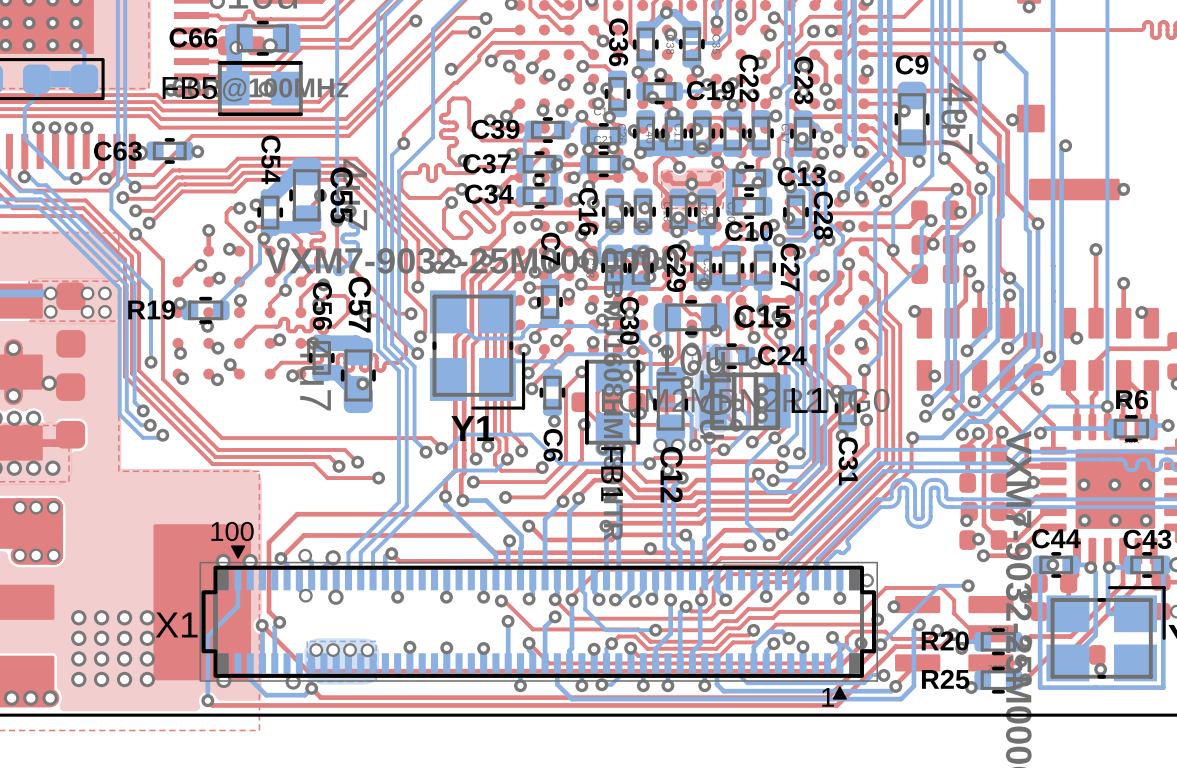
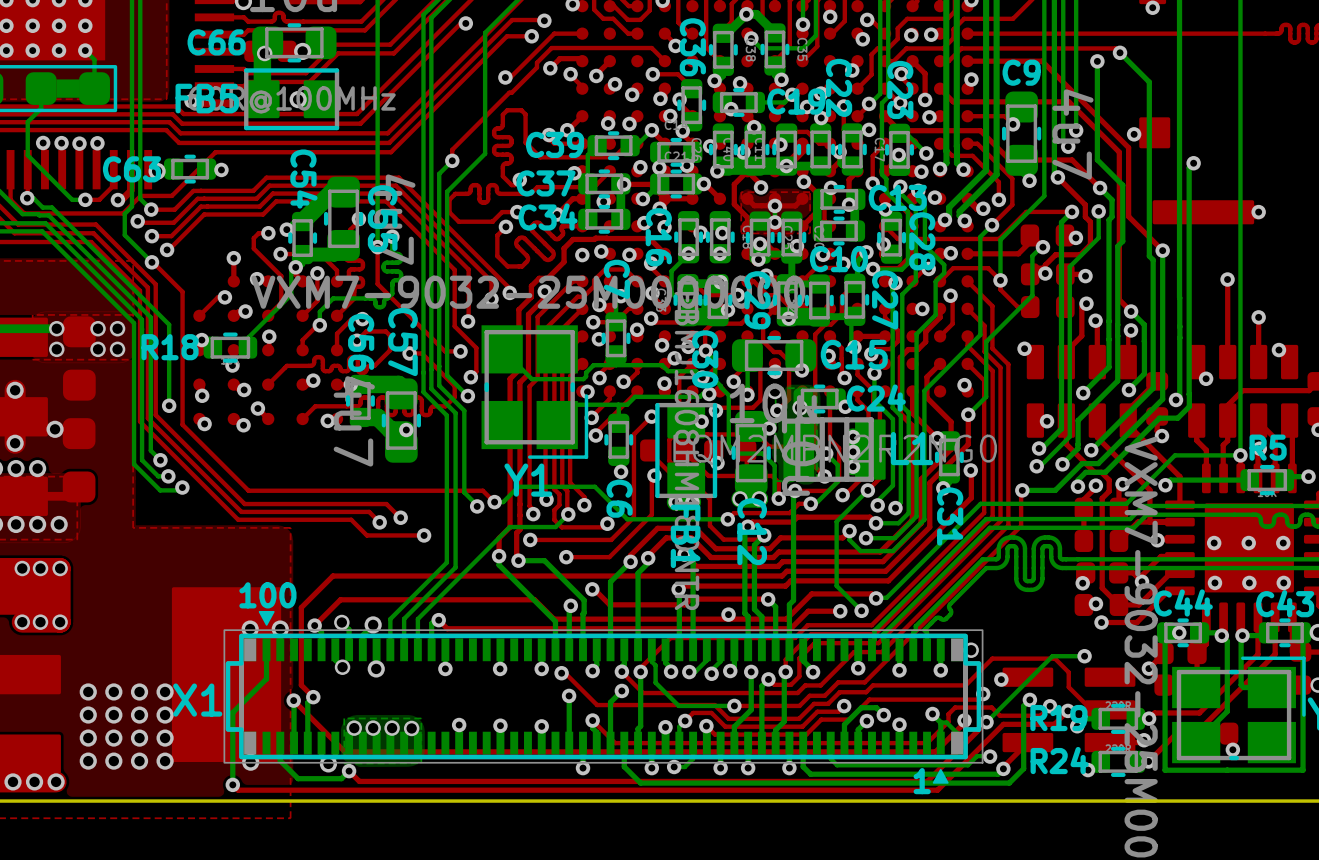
R19 name: R19 (151, 309) -> R18 (170, 347)
R6 name: R6 (1132, 399) -> R5 (1268, 447)
R20 name: R20 (945, 641) -> R19 (1058, 718)
R25 name: R25 (945, 679) -> R24 (1059, 760)

